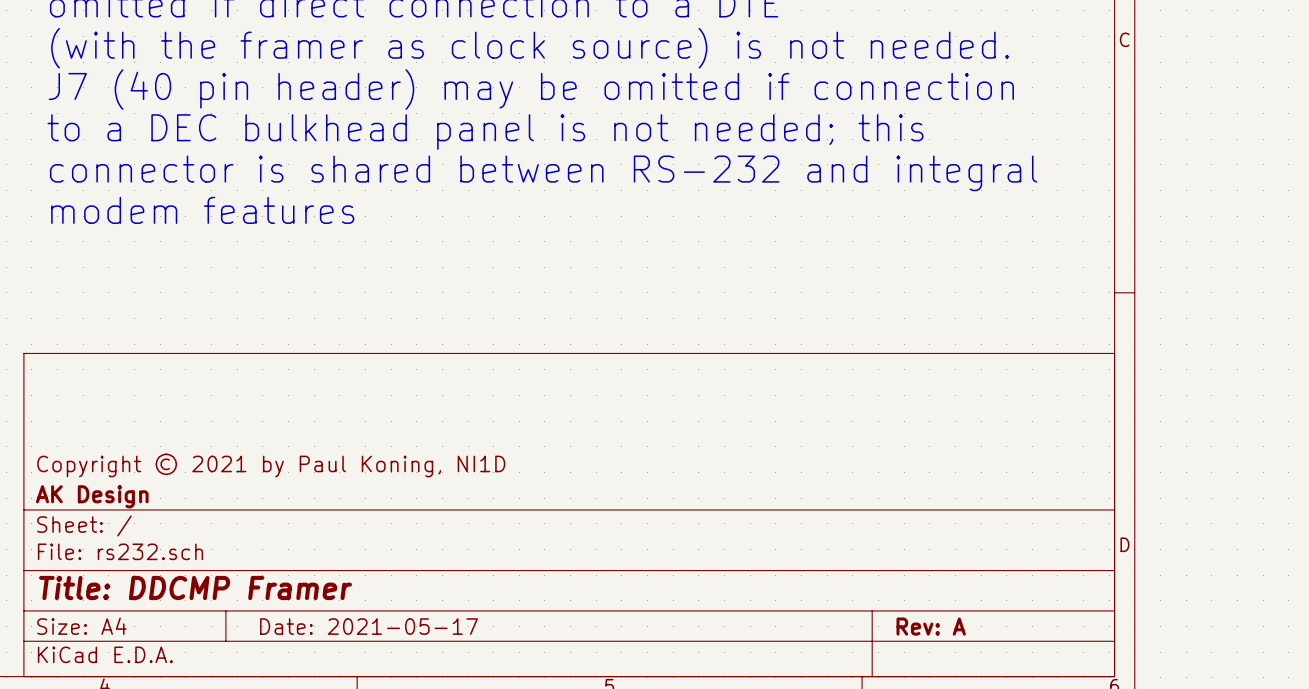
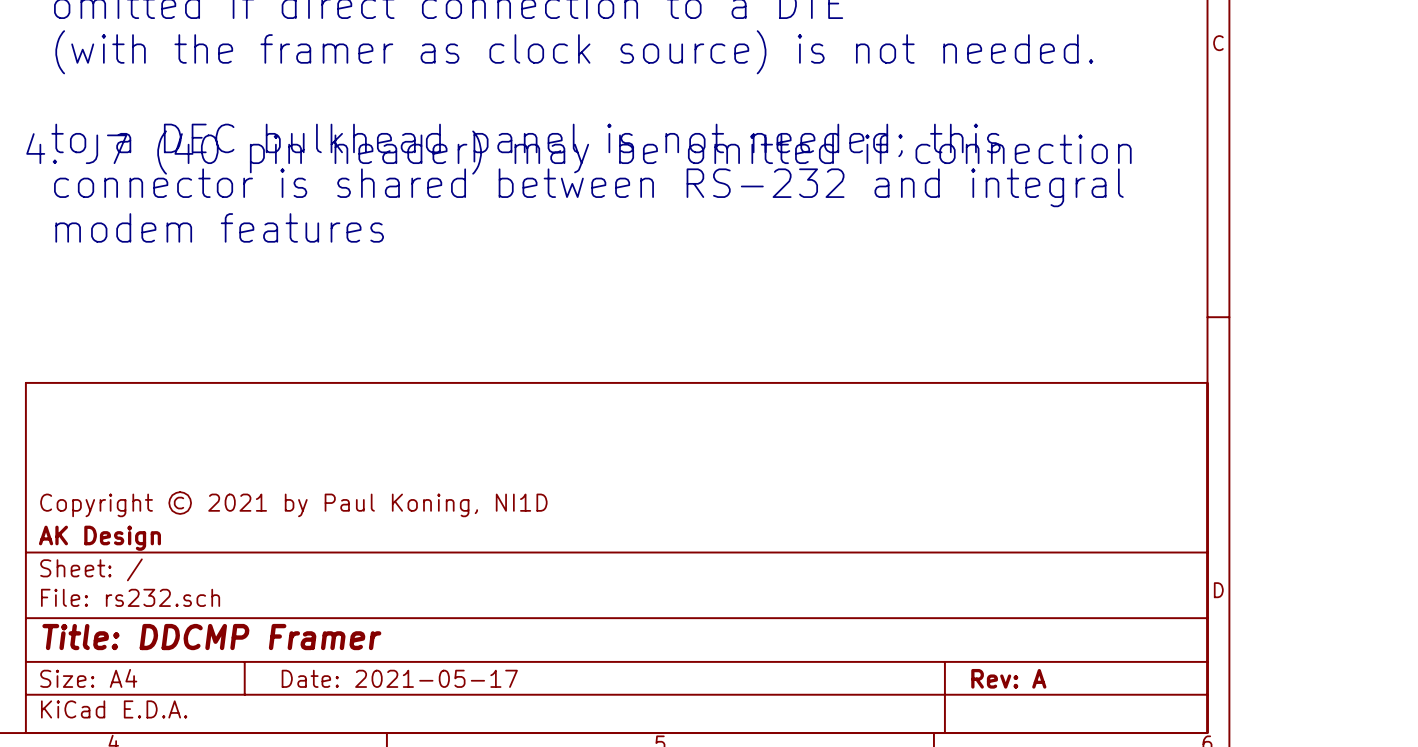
text: J7 (40 pin header) may be omitted if connection (531, 89) -> 4. J7 (40 pin header) may be omitted if connection (578, 152)

